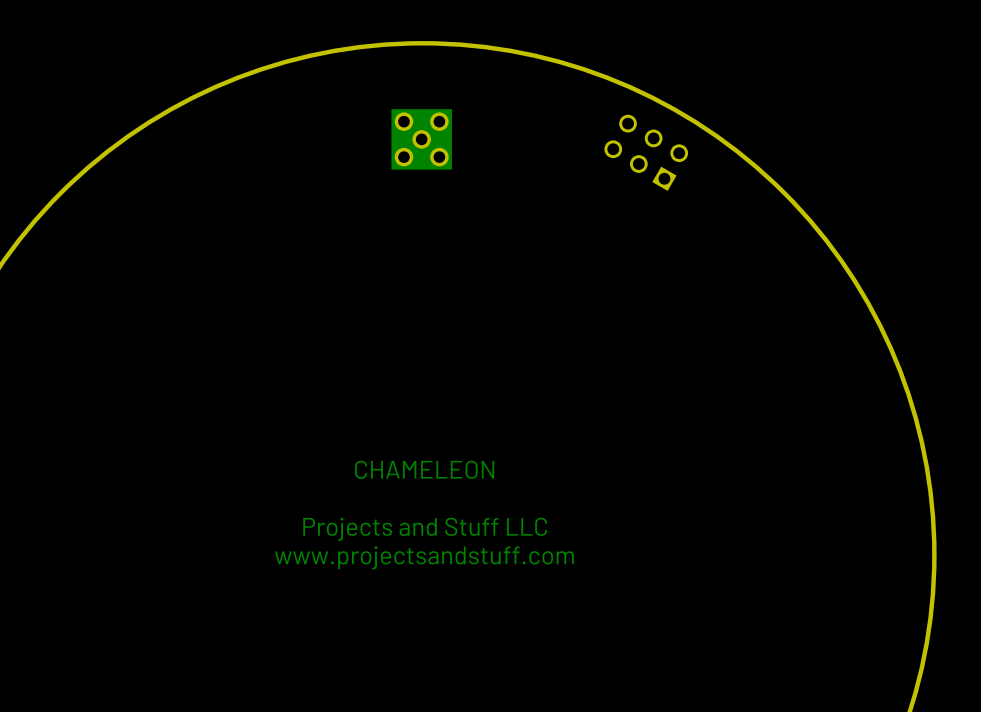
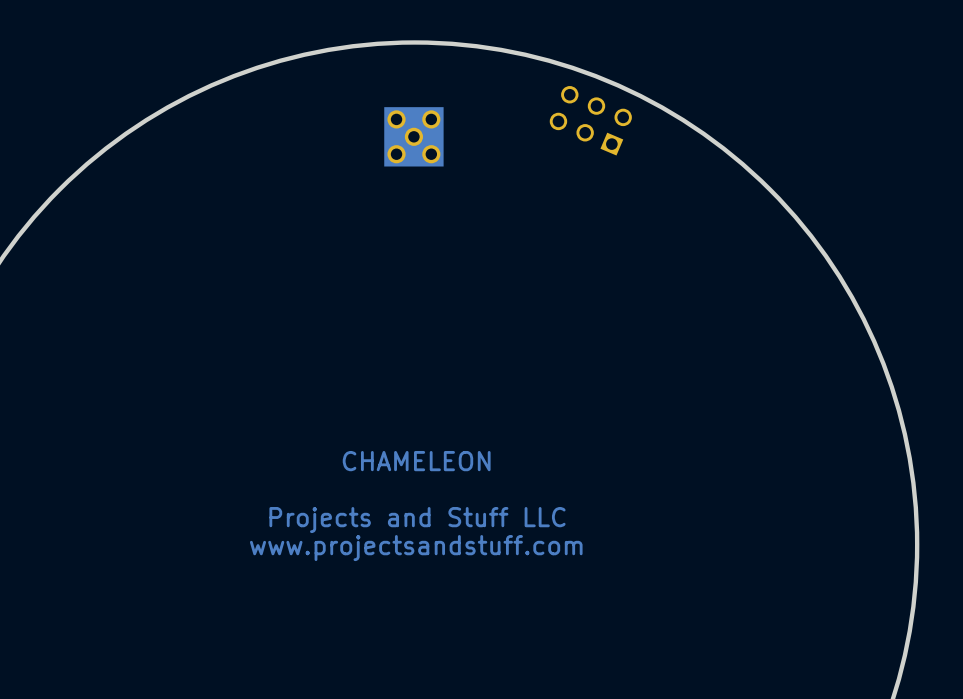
part: none -> (590, 120)
part: (646, 152) -> none

